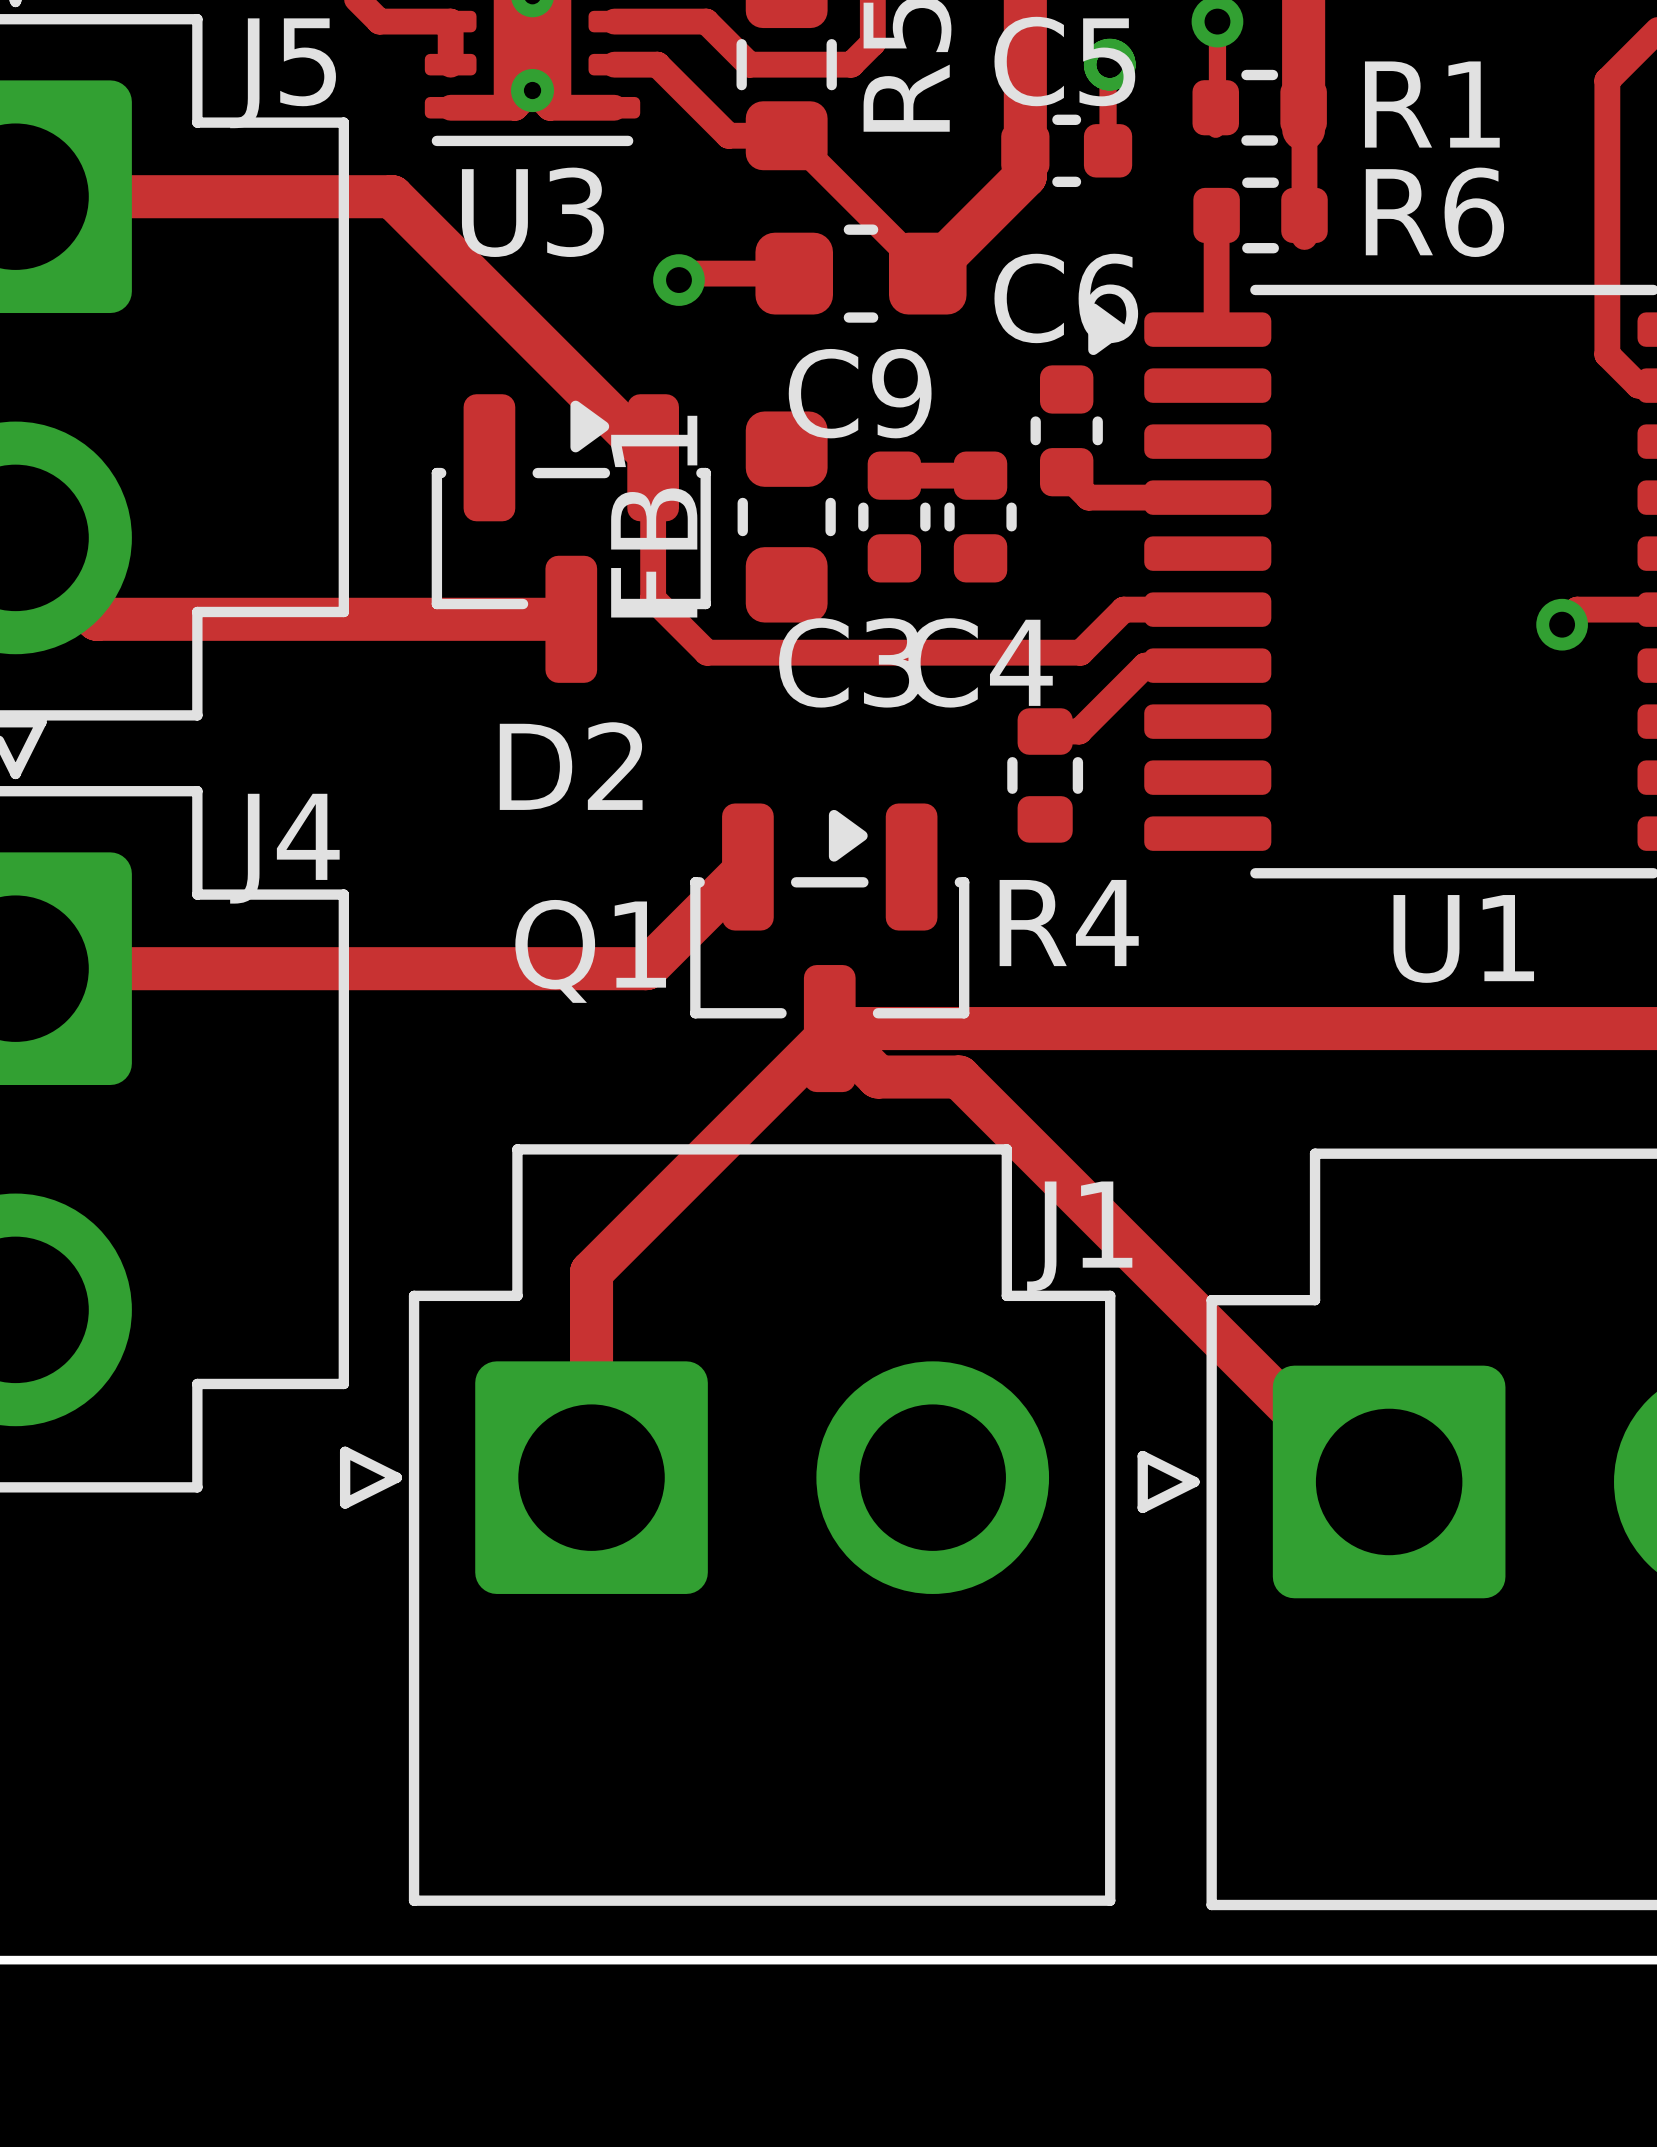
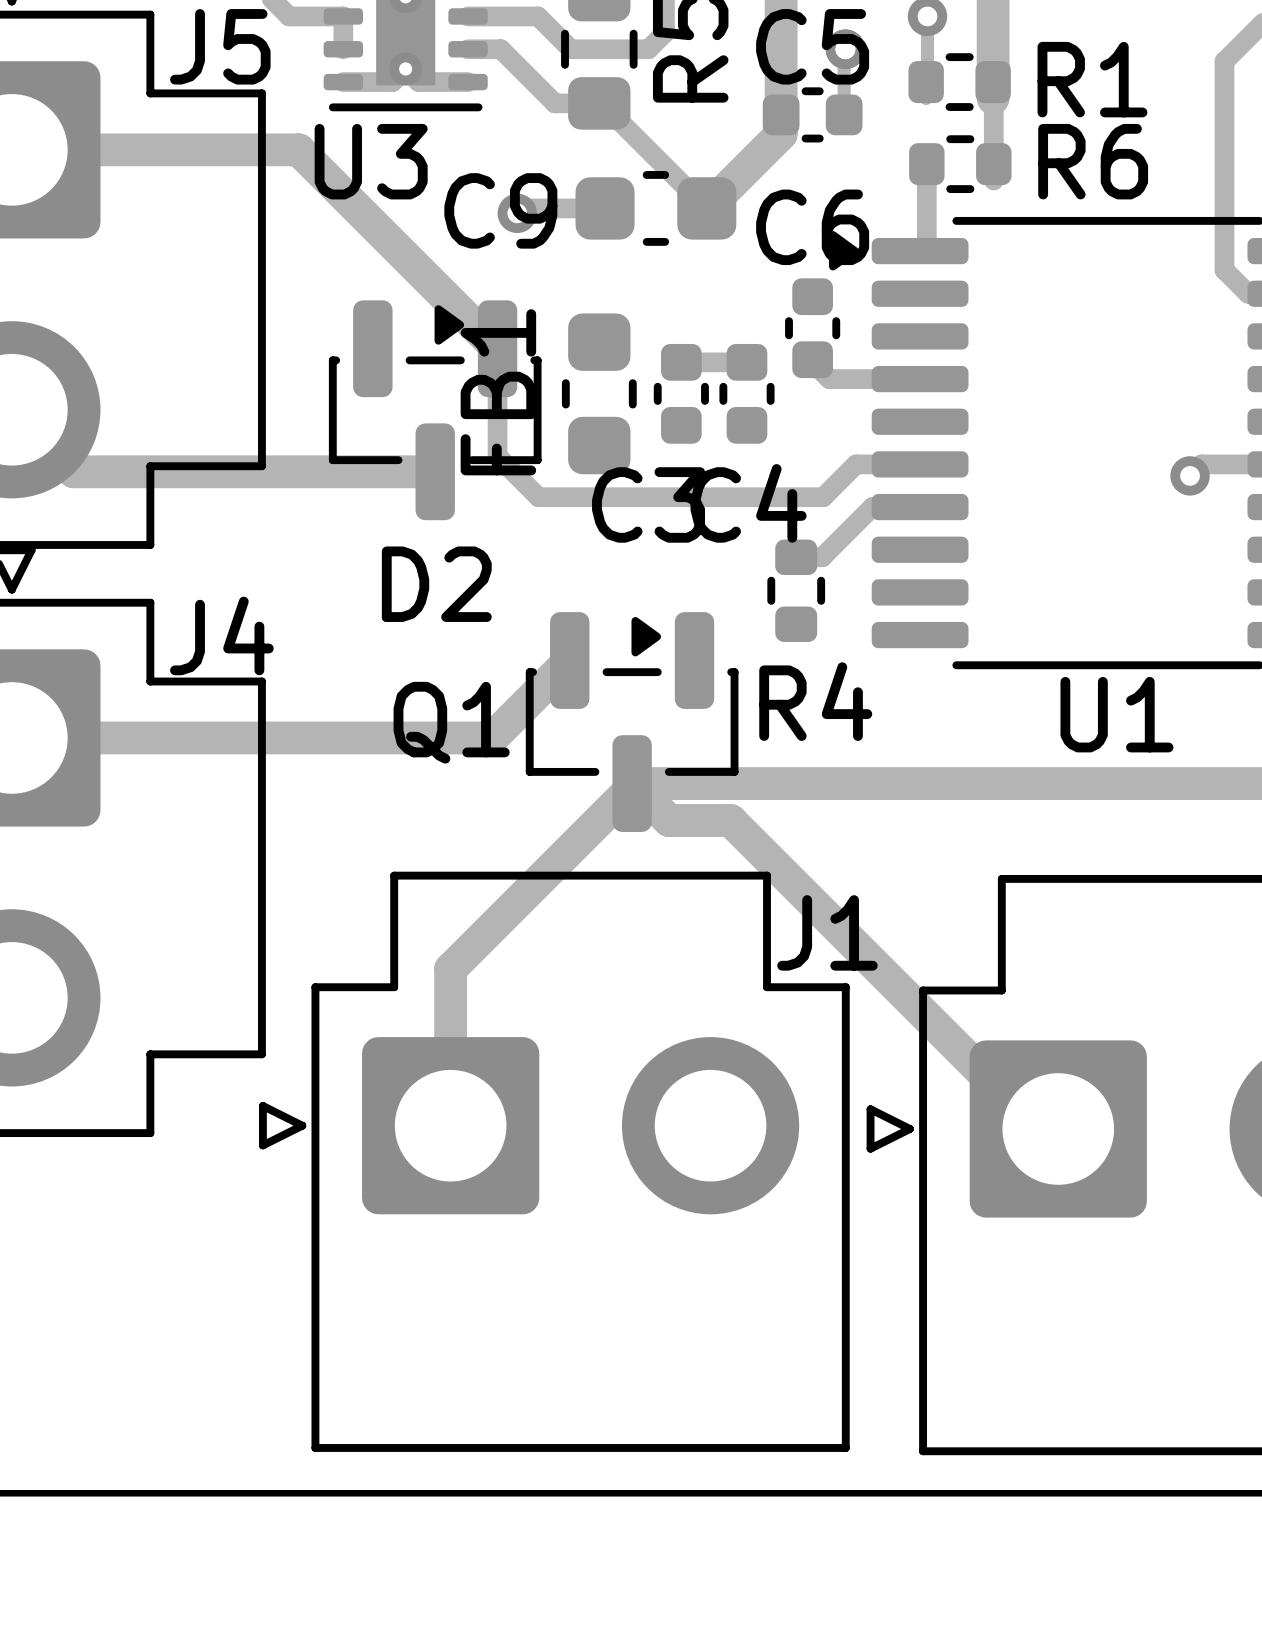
U3 name position: U3 (532, 212) -> U3 (371, 161)
C9 name position: C9 (860, 393) -> C9 (500, 210)

